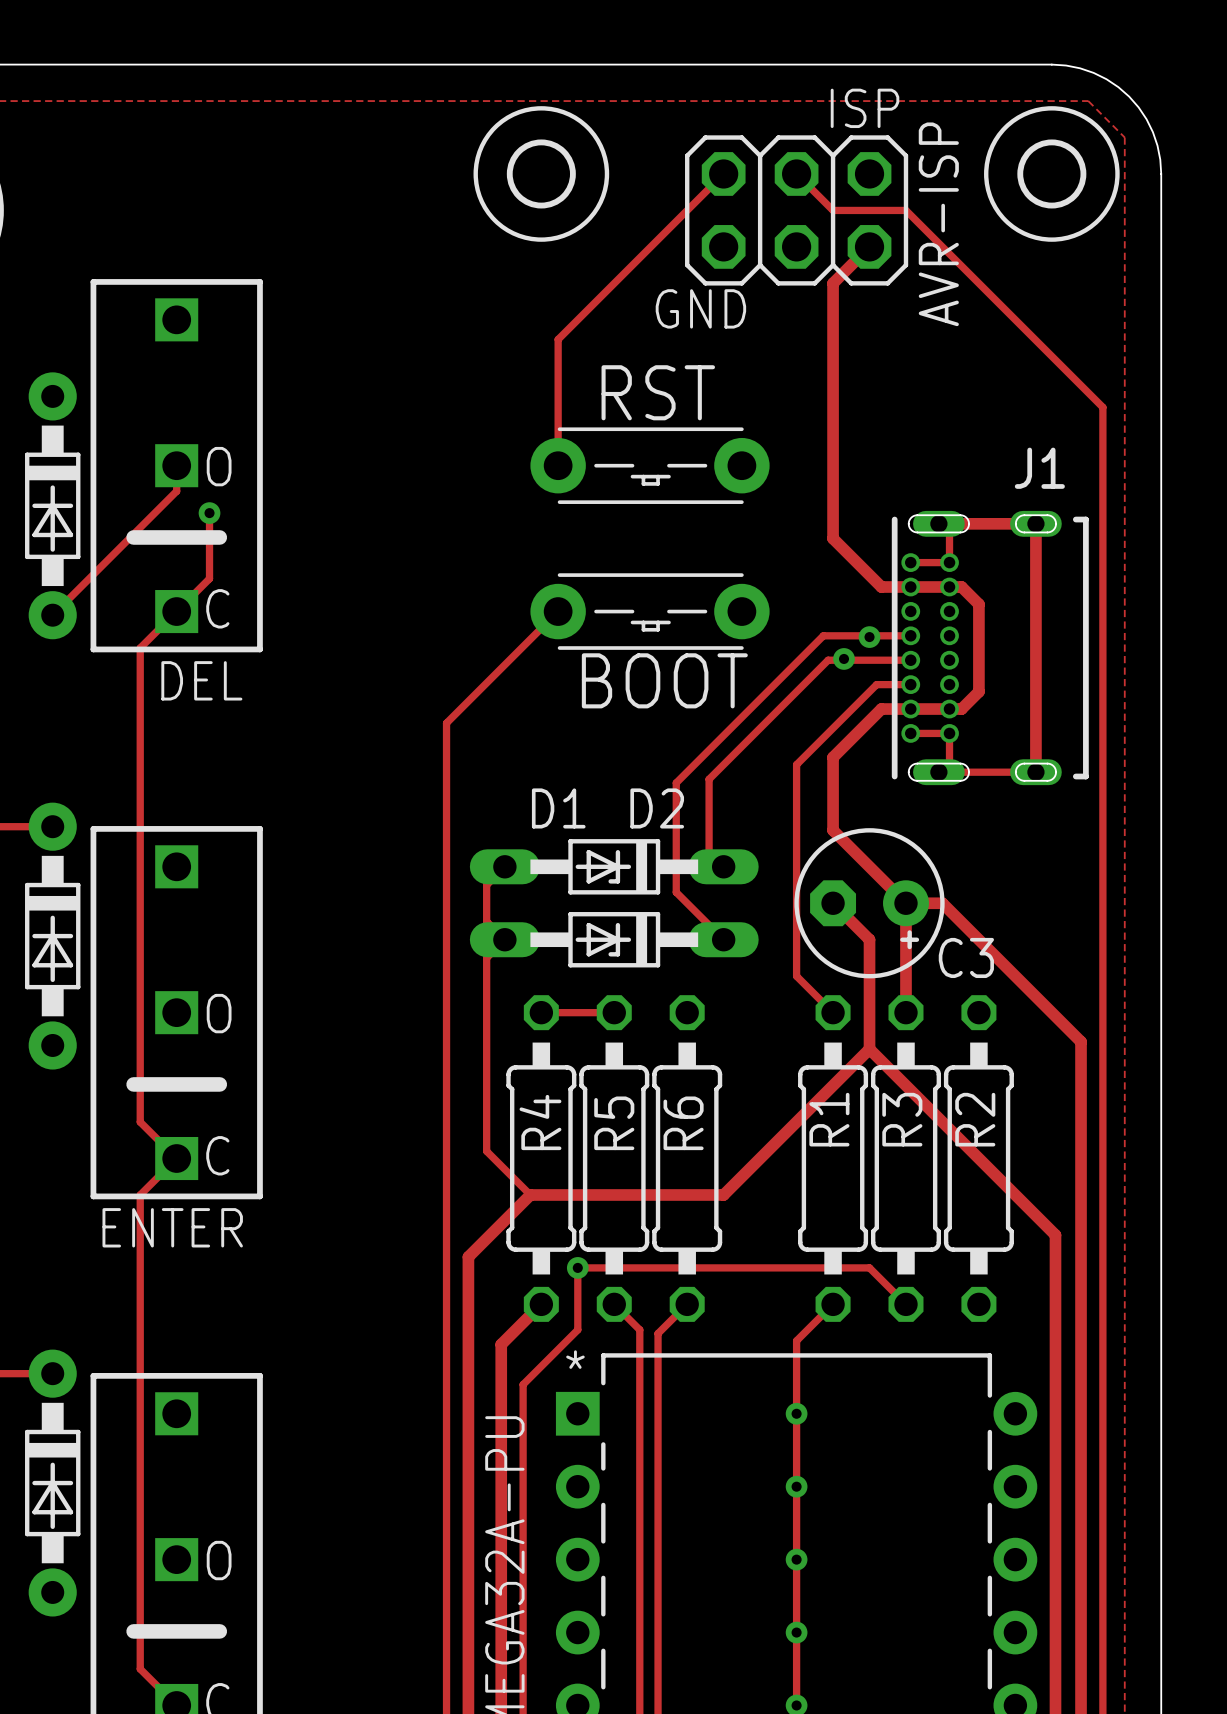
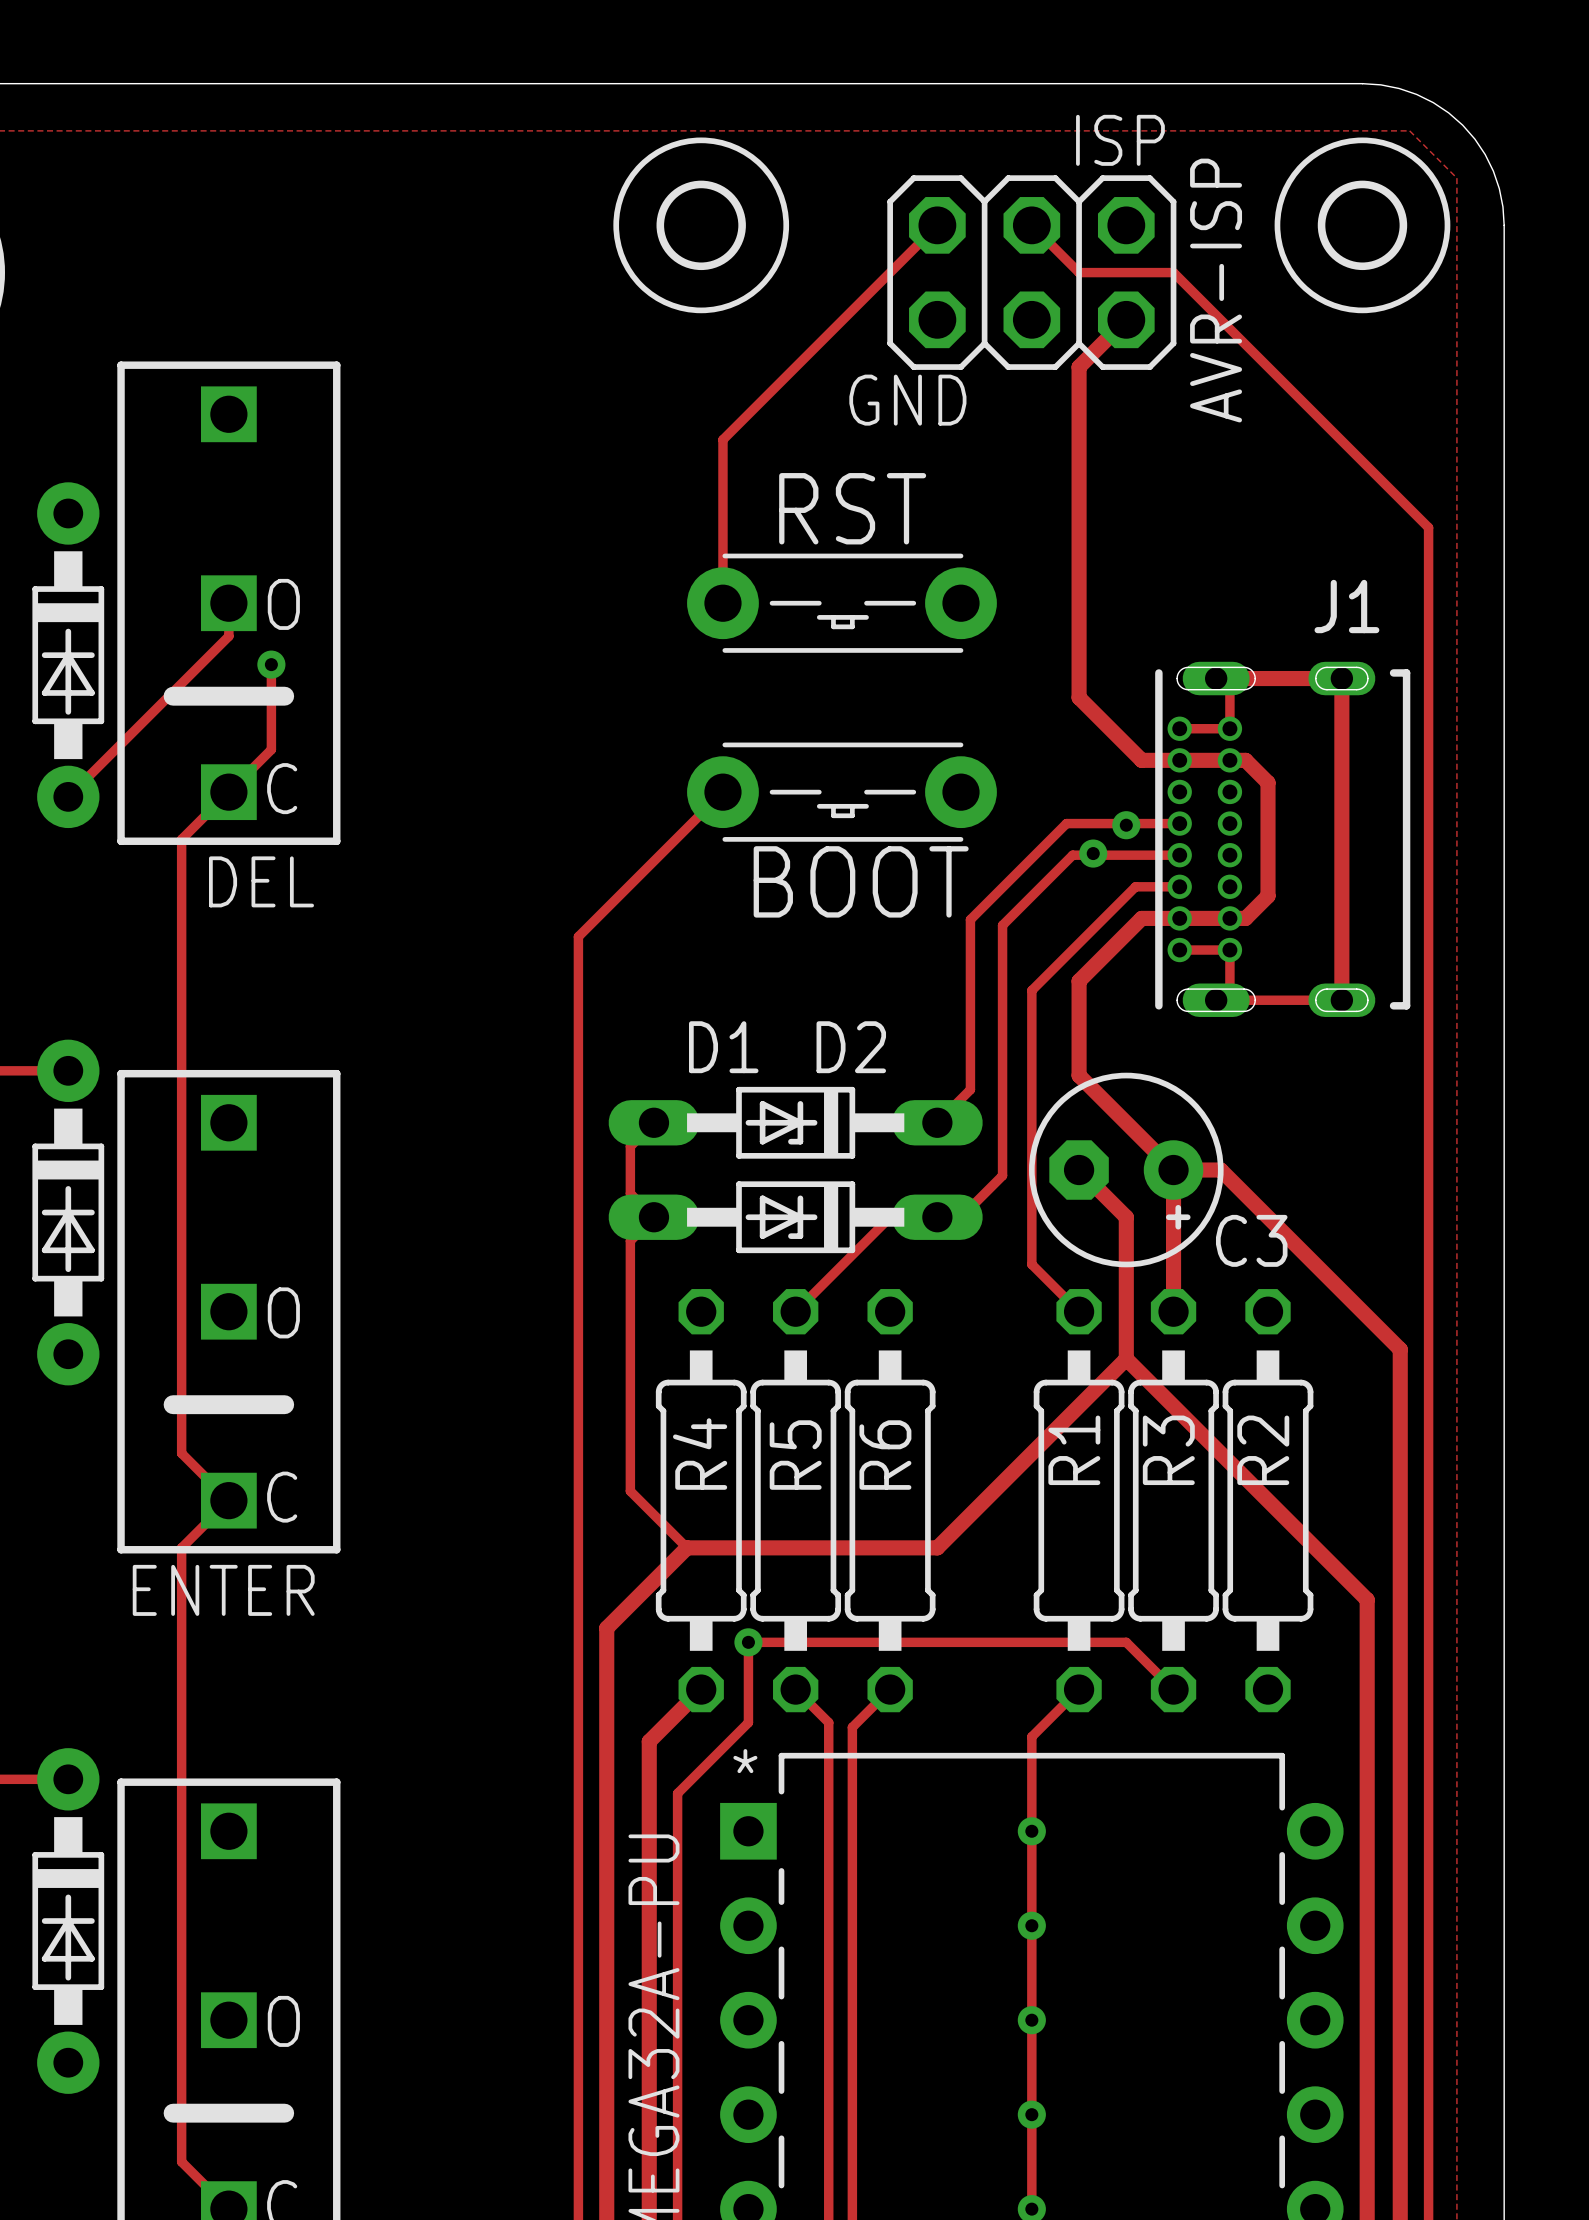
track: (749, 710) (676, 782) (676, 892) (723, 939) -> none
track: (773, 714) (709, 779) (709, 852) (723, 866) -> (970, 919) (970, 1089) (937, 1122)
track: (541, 1012) (614, 1012) -> (1002, 925) (1002, 1175) (960, 1217) (890, 1217) (795, 1311)

